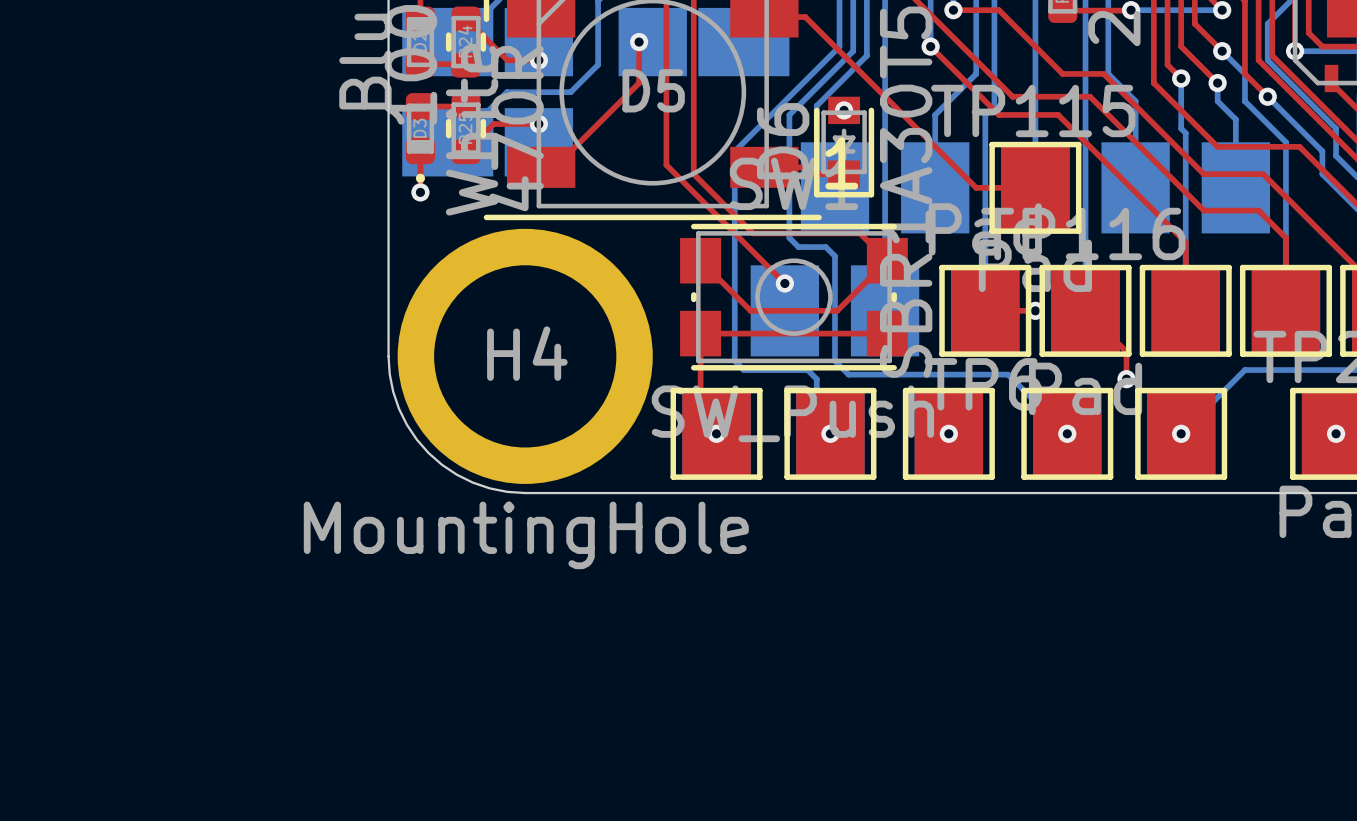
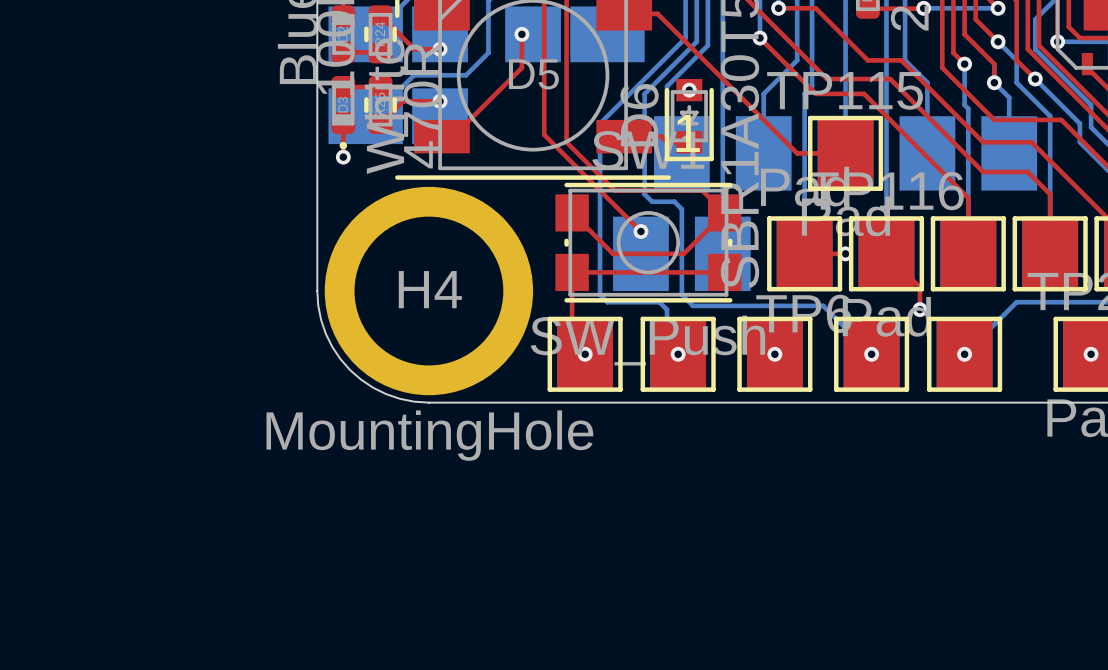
top track: (1181, 42) (1181, 46) (1217, 83) -> (964, 34) (994, 64) (994, 82)
via position: (1217, 83) -> (994, 82)

